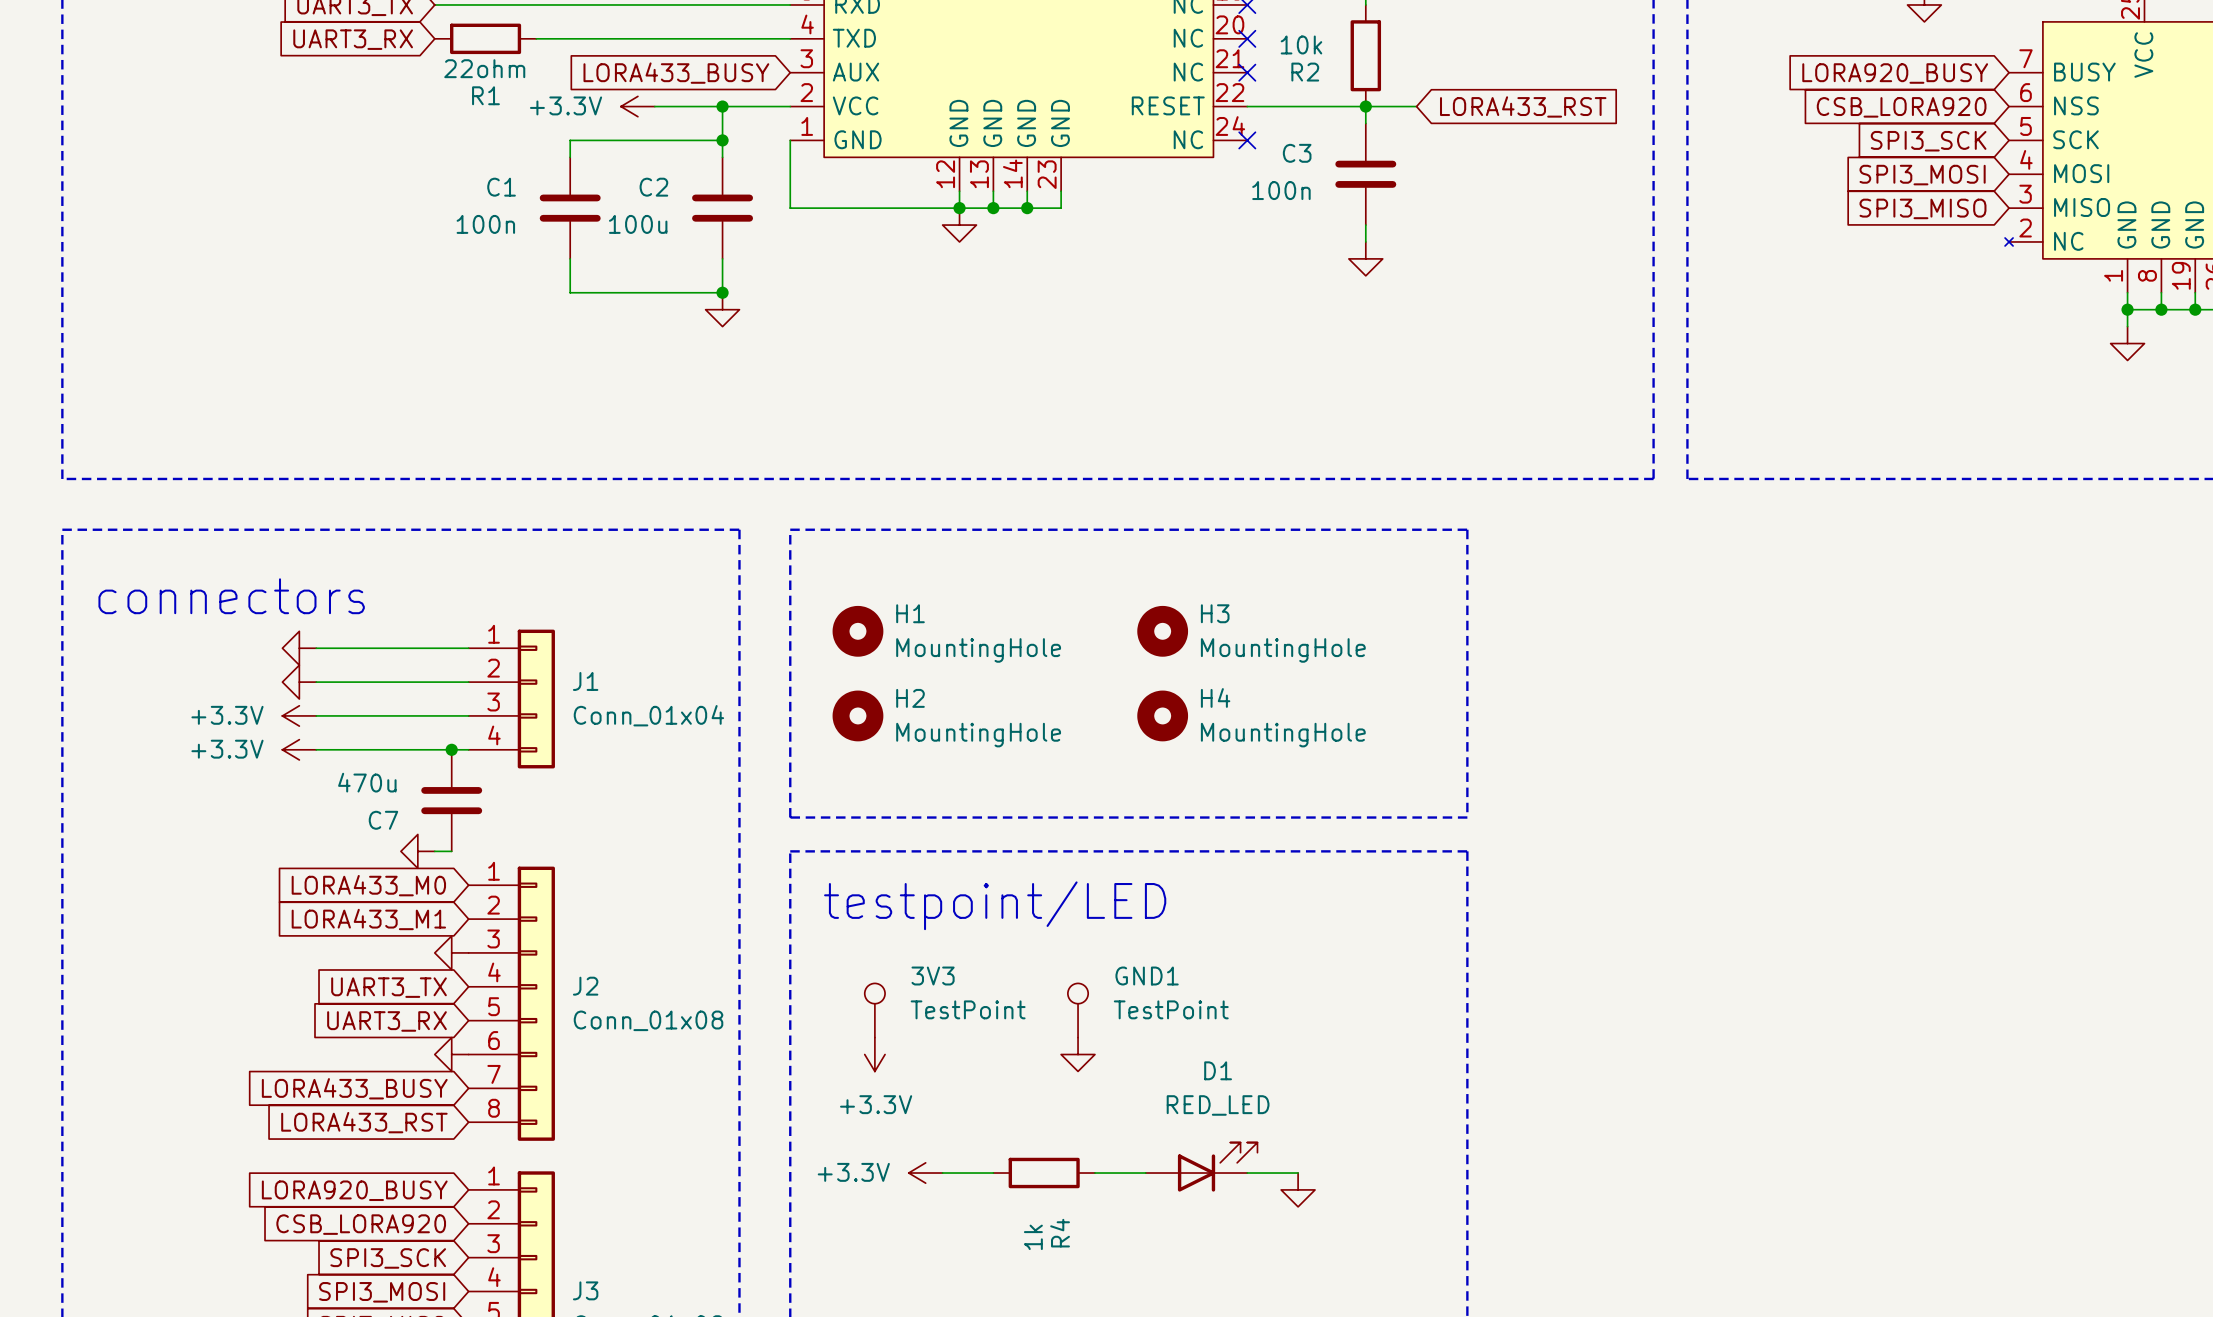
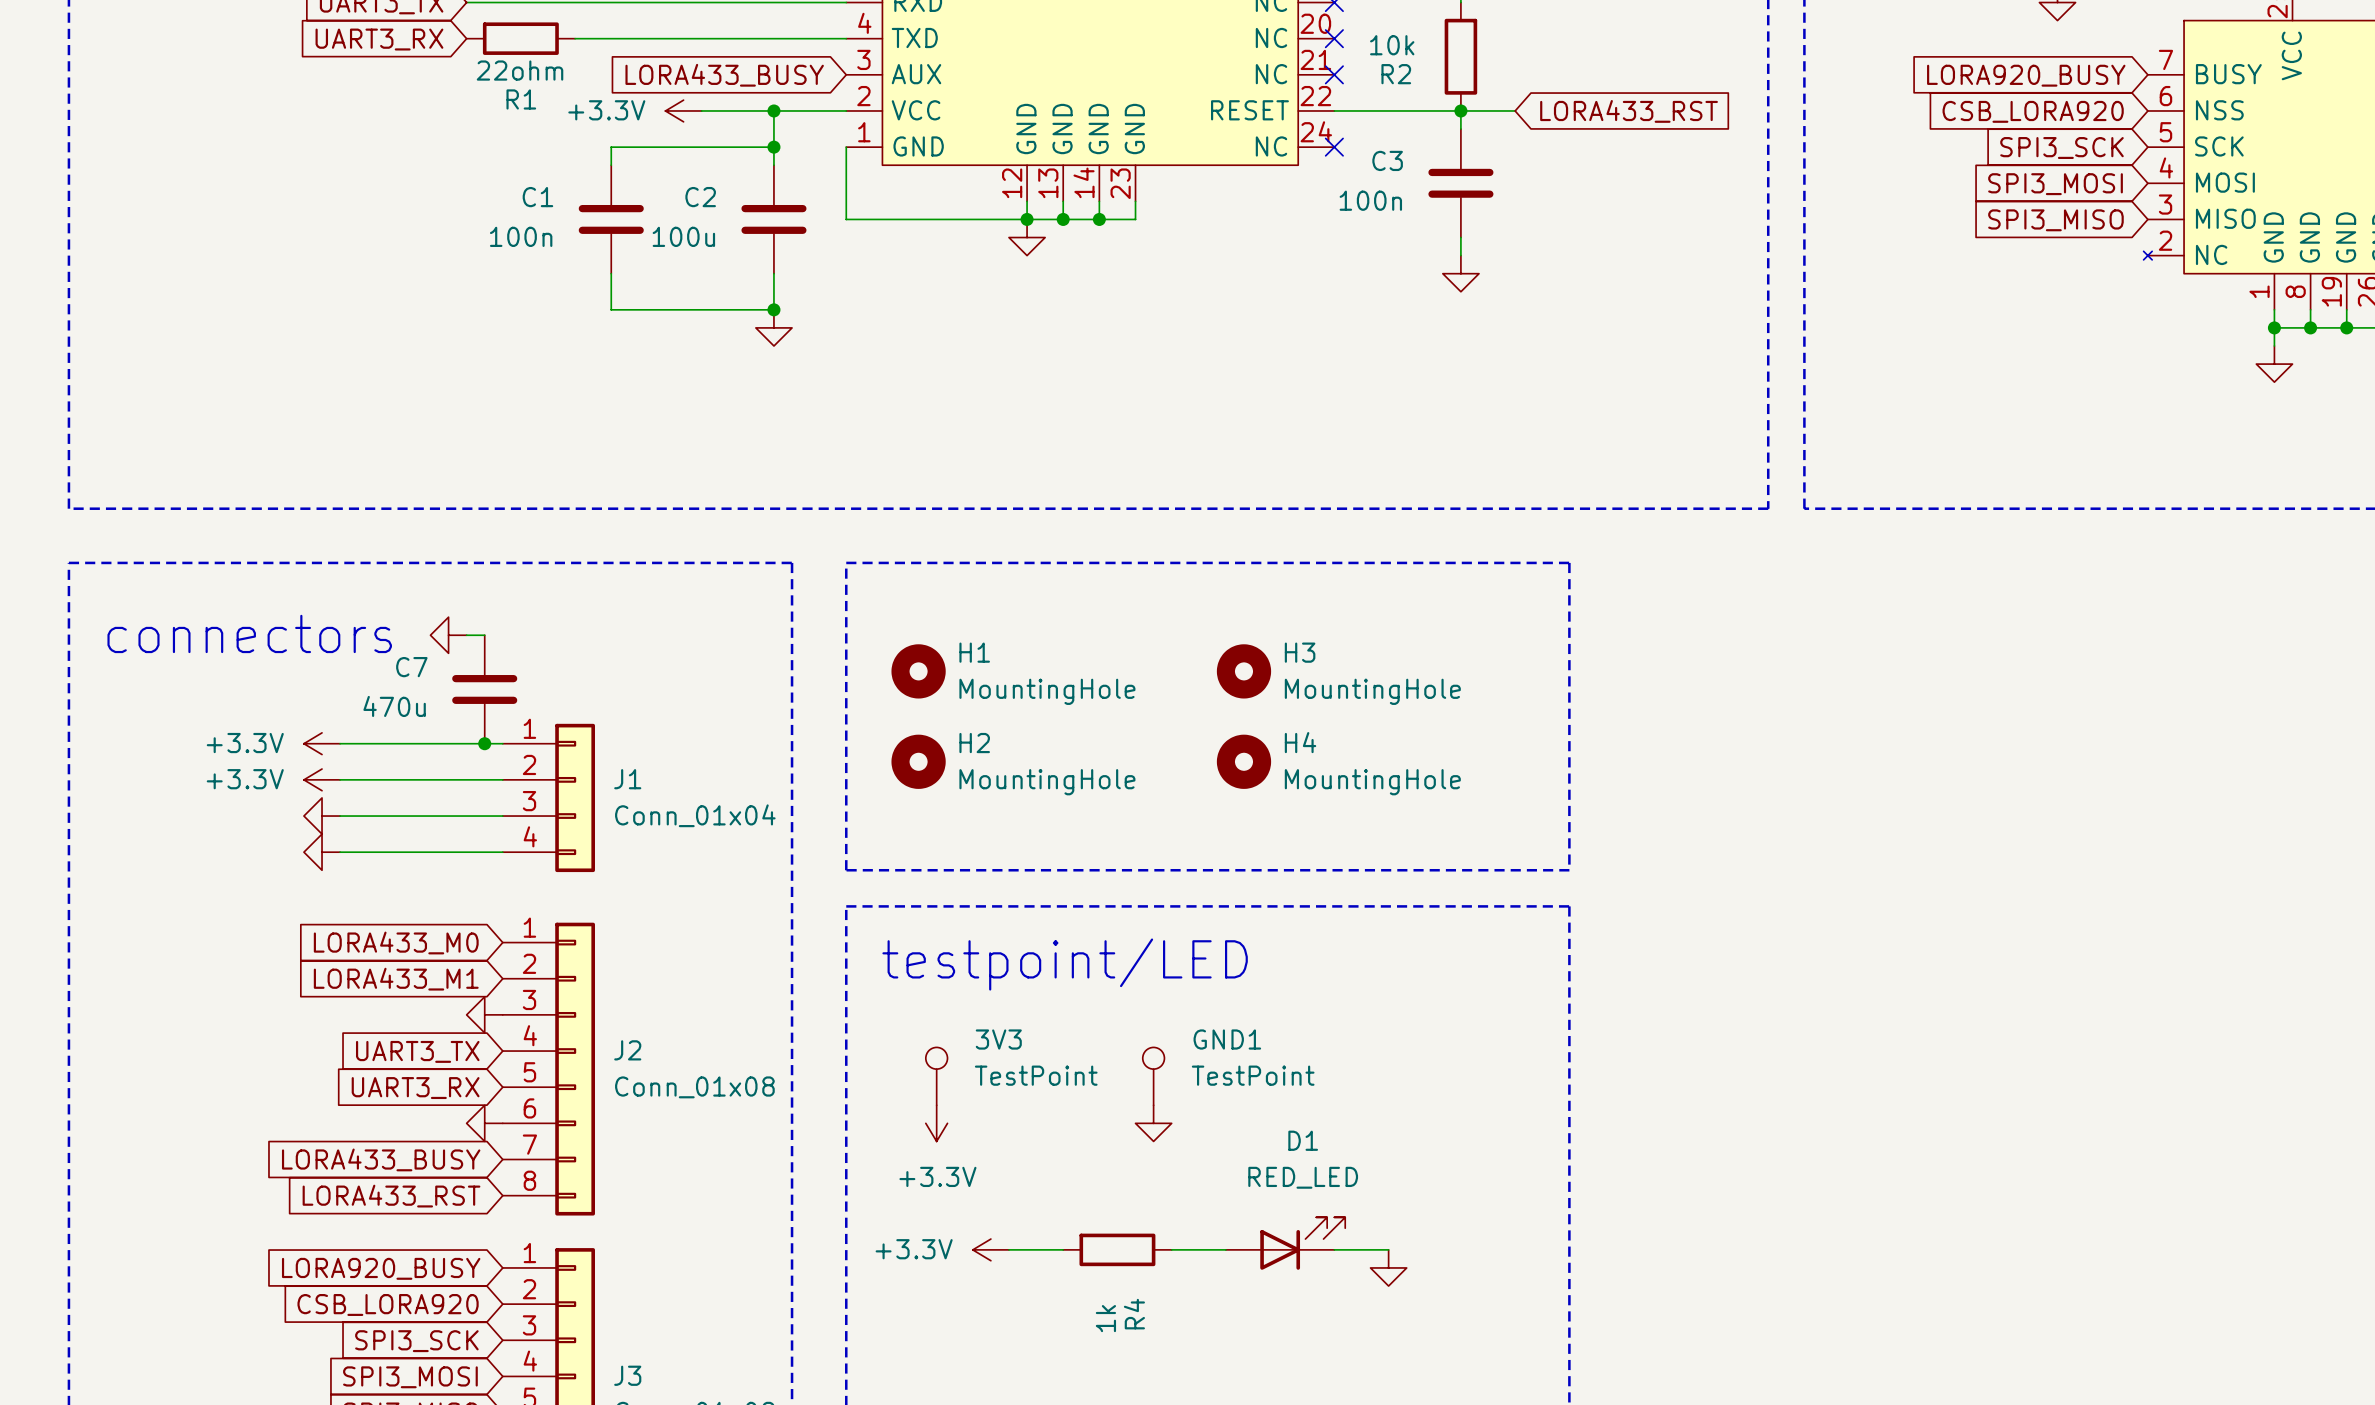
power symbol: none -> (448, 635)
power symbol: (299, 648) -> none
wire: (316, 648) (468, 648) -> (340, 743) (502, 743)
power symbol: (299, 682) -> none
wire: (316, 682) (468, 682) -> (340, 779) (502, 779)
power symbol: none -> +3.3V (322, 743)
J1 position: (511, 699) -> (548, 797)
power symbol: +3.3V (299, 715) -> none
wire: (316, 715) (468, 715) -> (340, 816) (502, 816)
power symbol: none -> +3.3V (322, 779)
power symbol: +3.3V (299, 749) -> none
wire: (316, 749) (468, 749) -> (340, 852) (502, 852)
junction position: (451, 749) -> (484, 743)
power symbol: none -> (322, 816)
C7 value position: 470u (367, 782) -> 470u (394, 706)
power symbol: none -> (322, 852)
C7 position: (451, 800) -> (484, 689)
C7 name position: C7 (383, 820) -> C7 (411, 667)
power symbol: (417, 851) -> none
wire: (434, 851) (451, 851) -> (466, 635) (484, 635)

